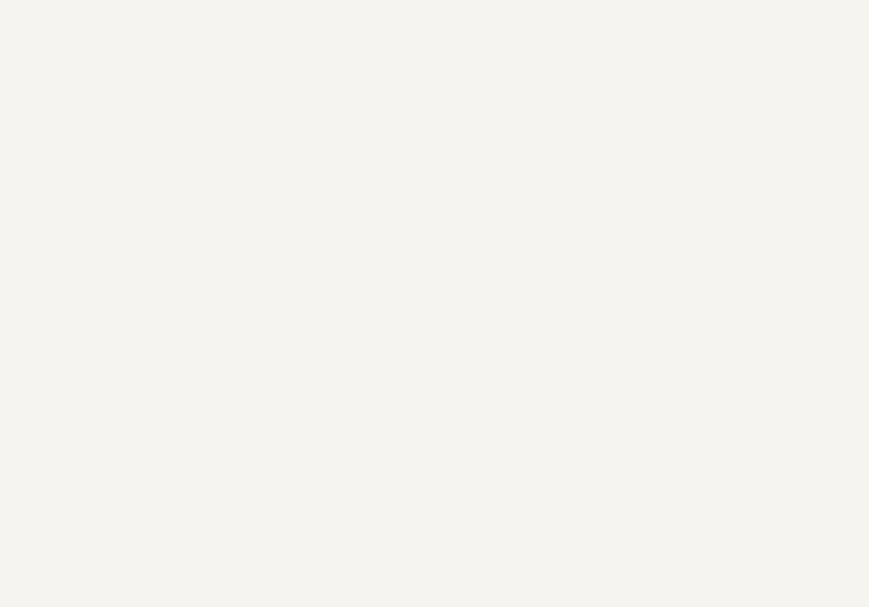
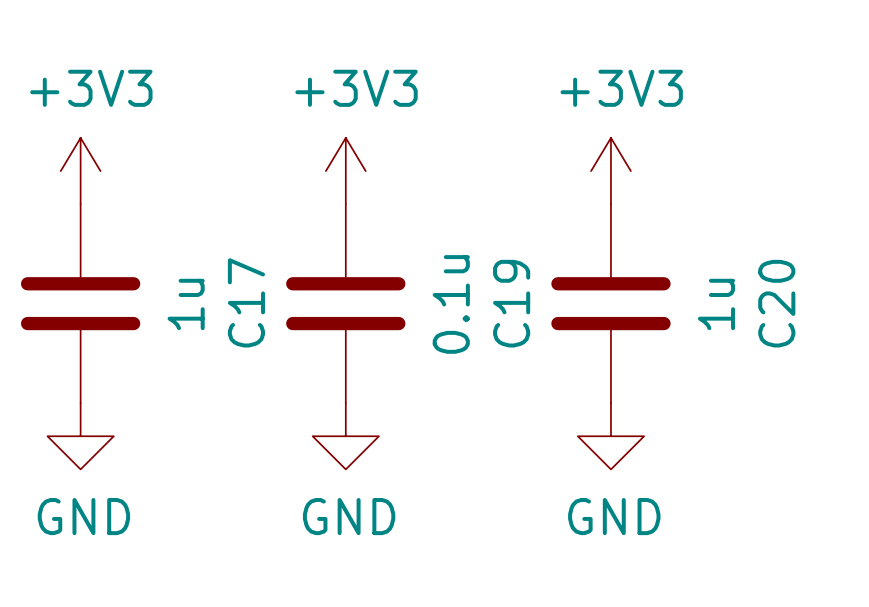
power symbol: none -> +3V3 (80, 171)
power symbol: none -> +3V3 (345, 171)
power symbol: none -> +3V3 (610, 171)
C17: none -> 1u (80, 303)
C19: none -> 0.1u (345, 303)
C20: none -> 1u (610, 303)
power symbol: none -> GND (80, 436)
power symbol: none -> GND (345, 436)
power symbol: none -> GND (610, 436)

